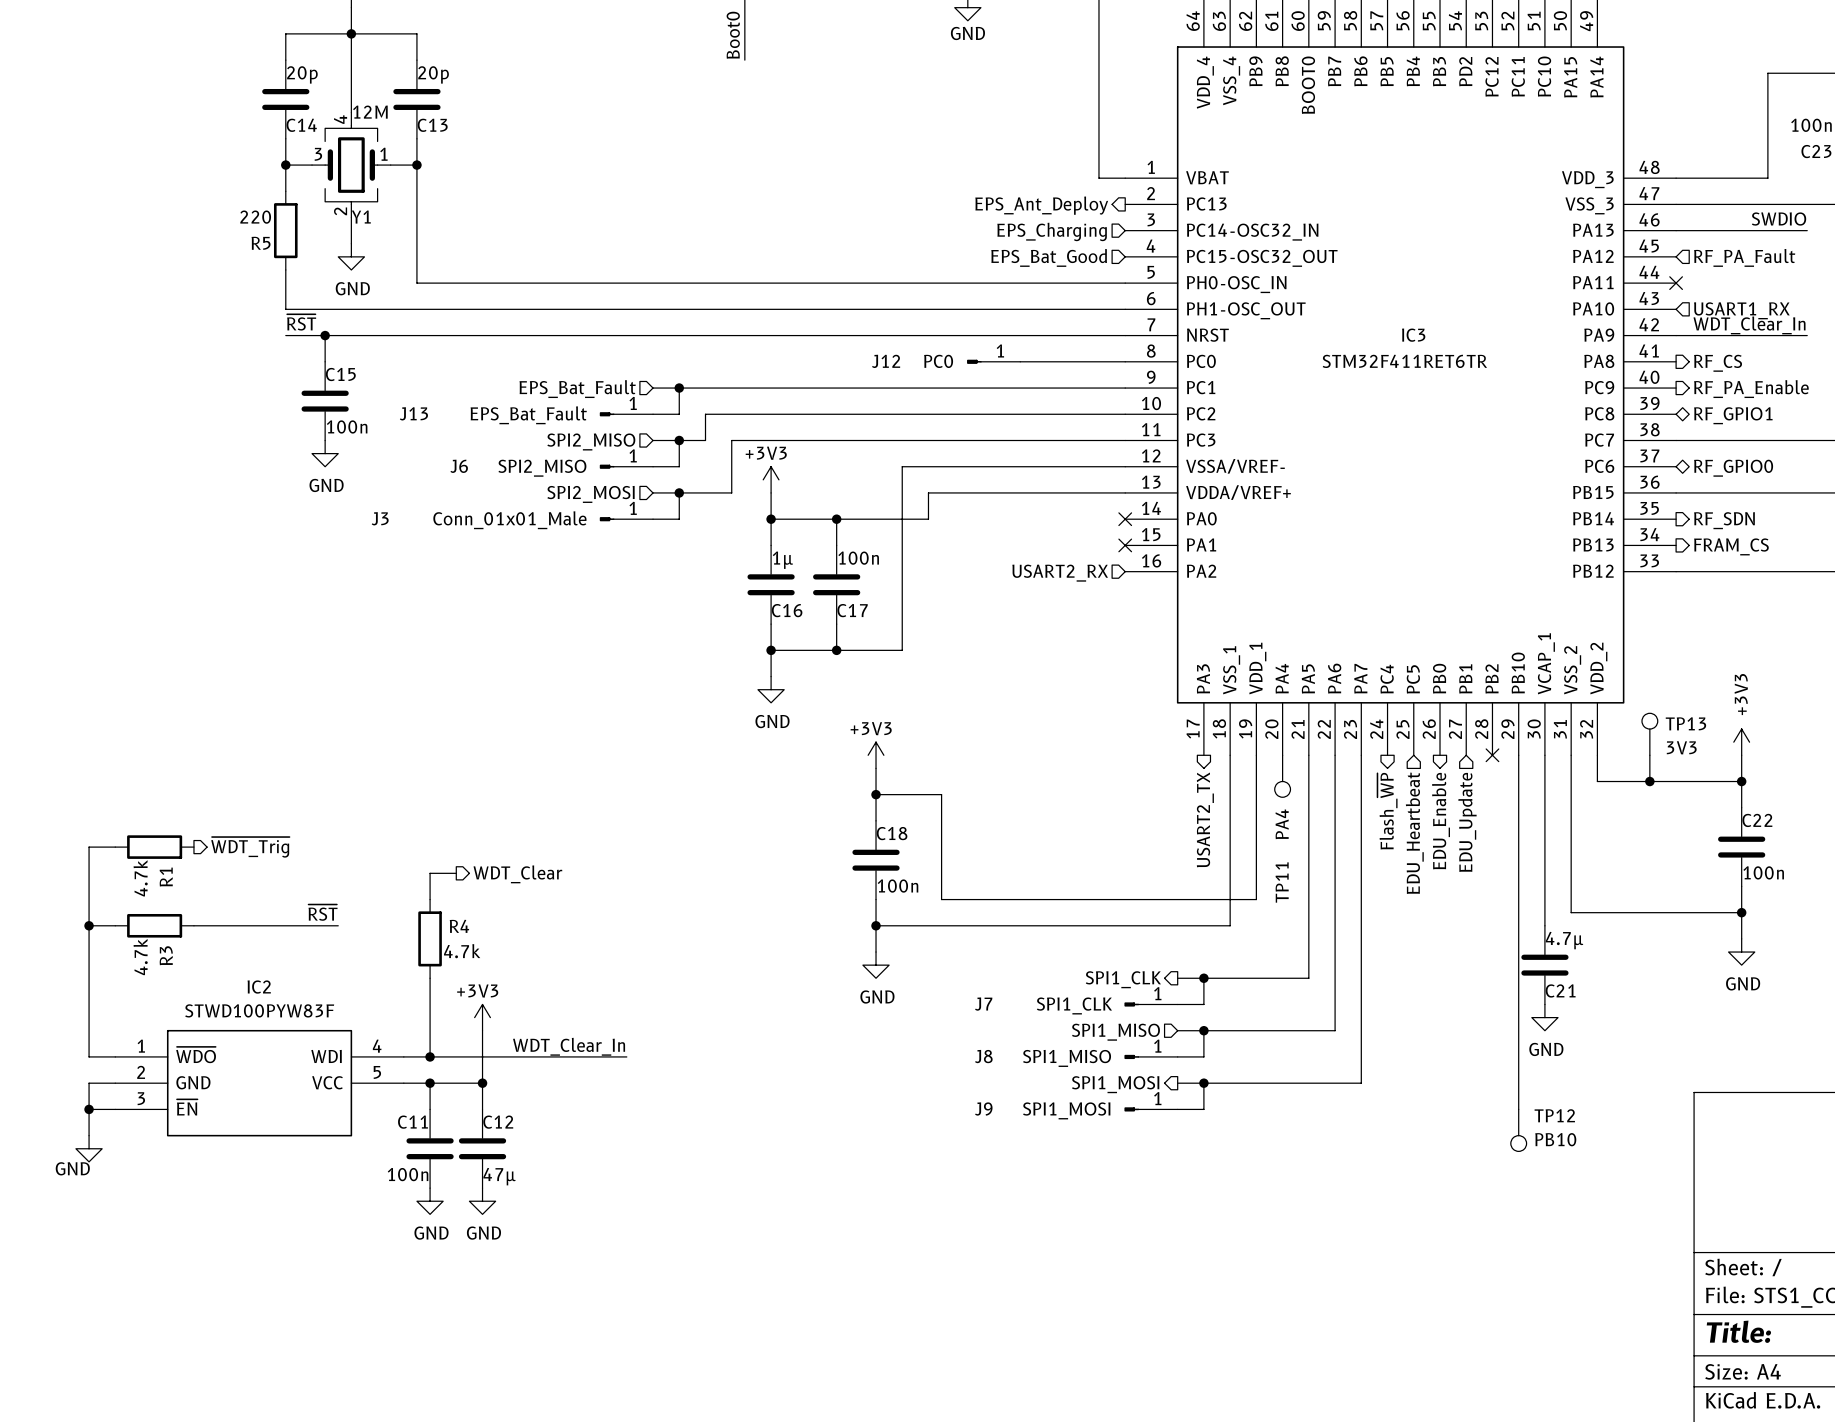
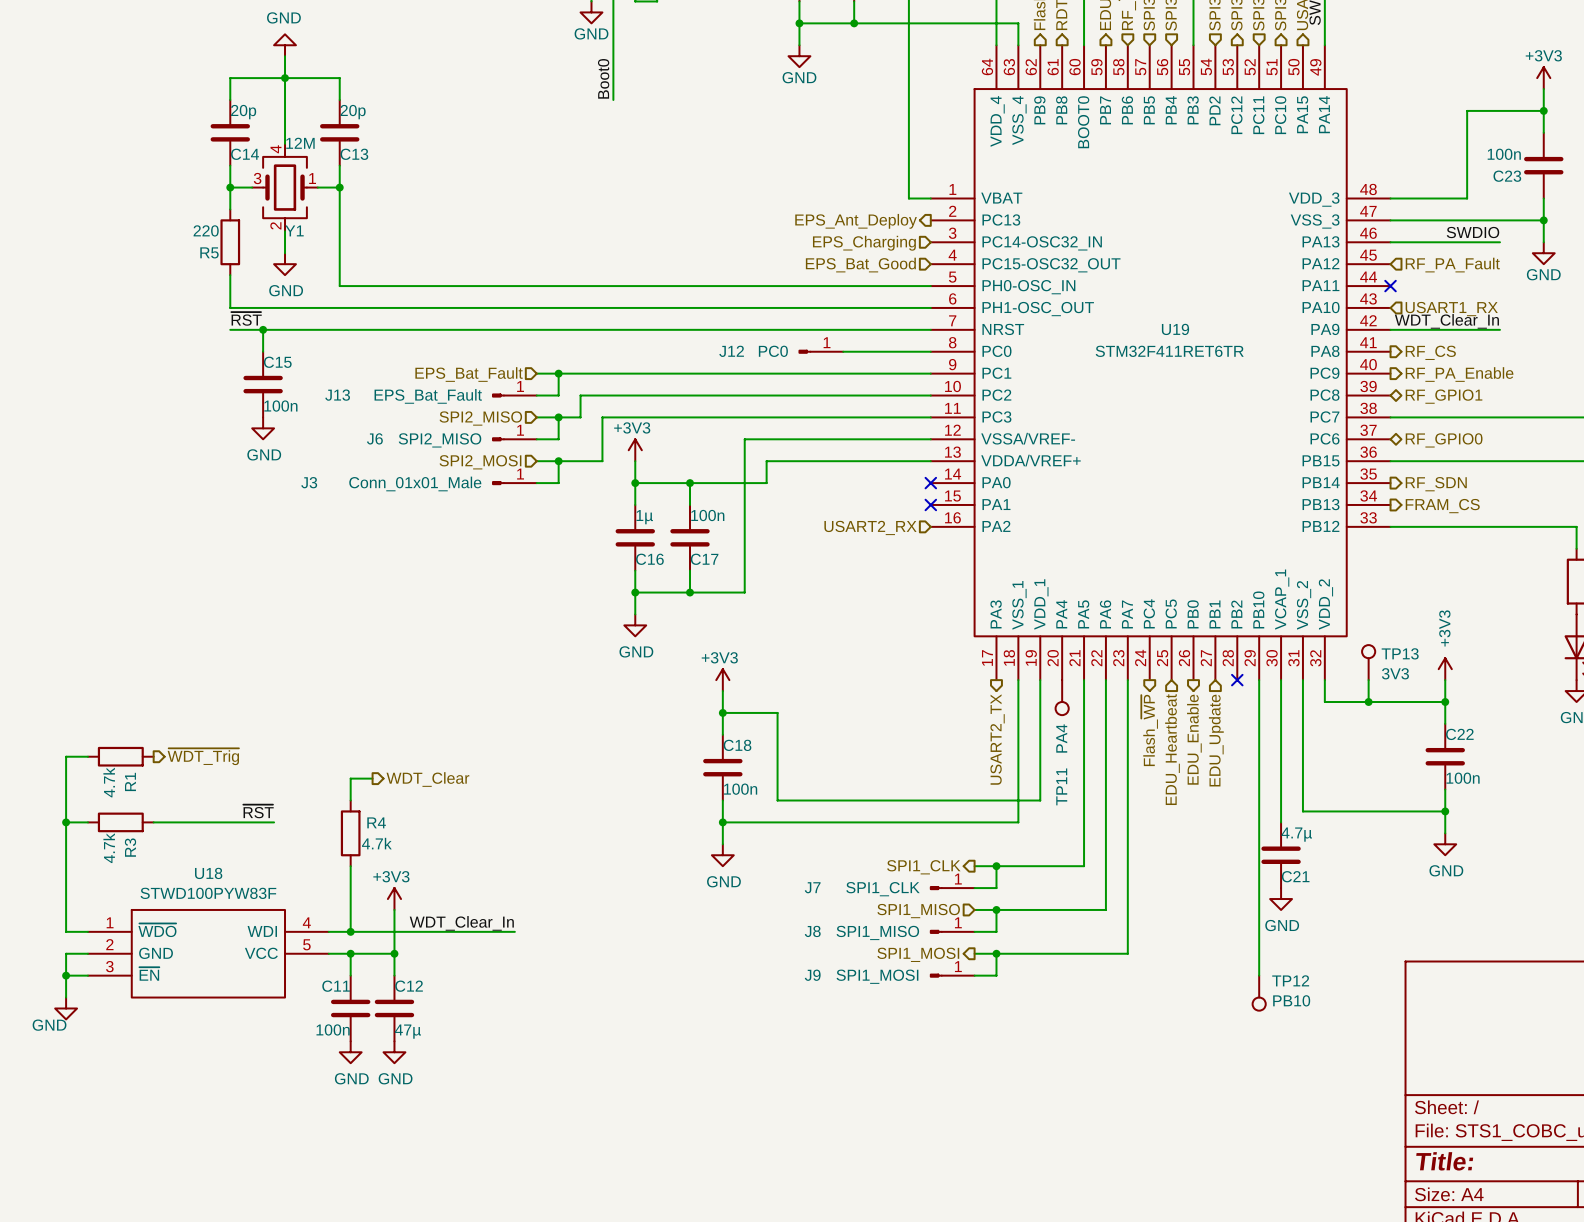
IC3 name: IC3 (1413, 335) -> U19 (1175, 329)
IC2 name: IC2 (259, 987) -> U18 (208, 873)

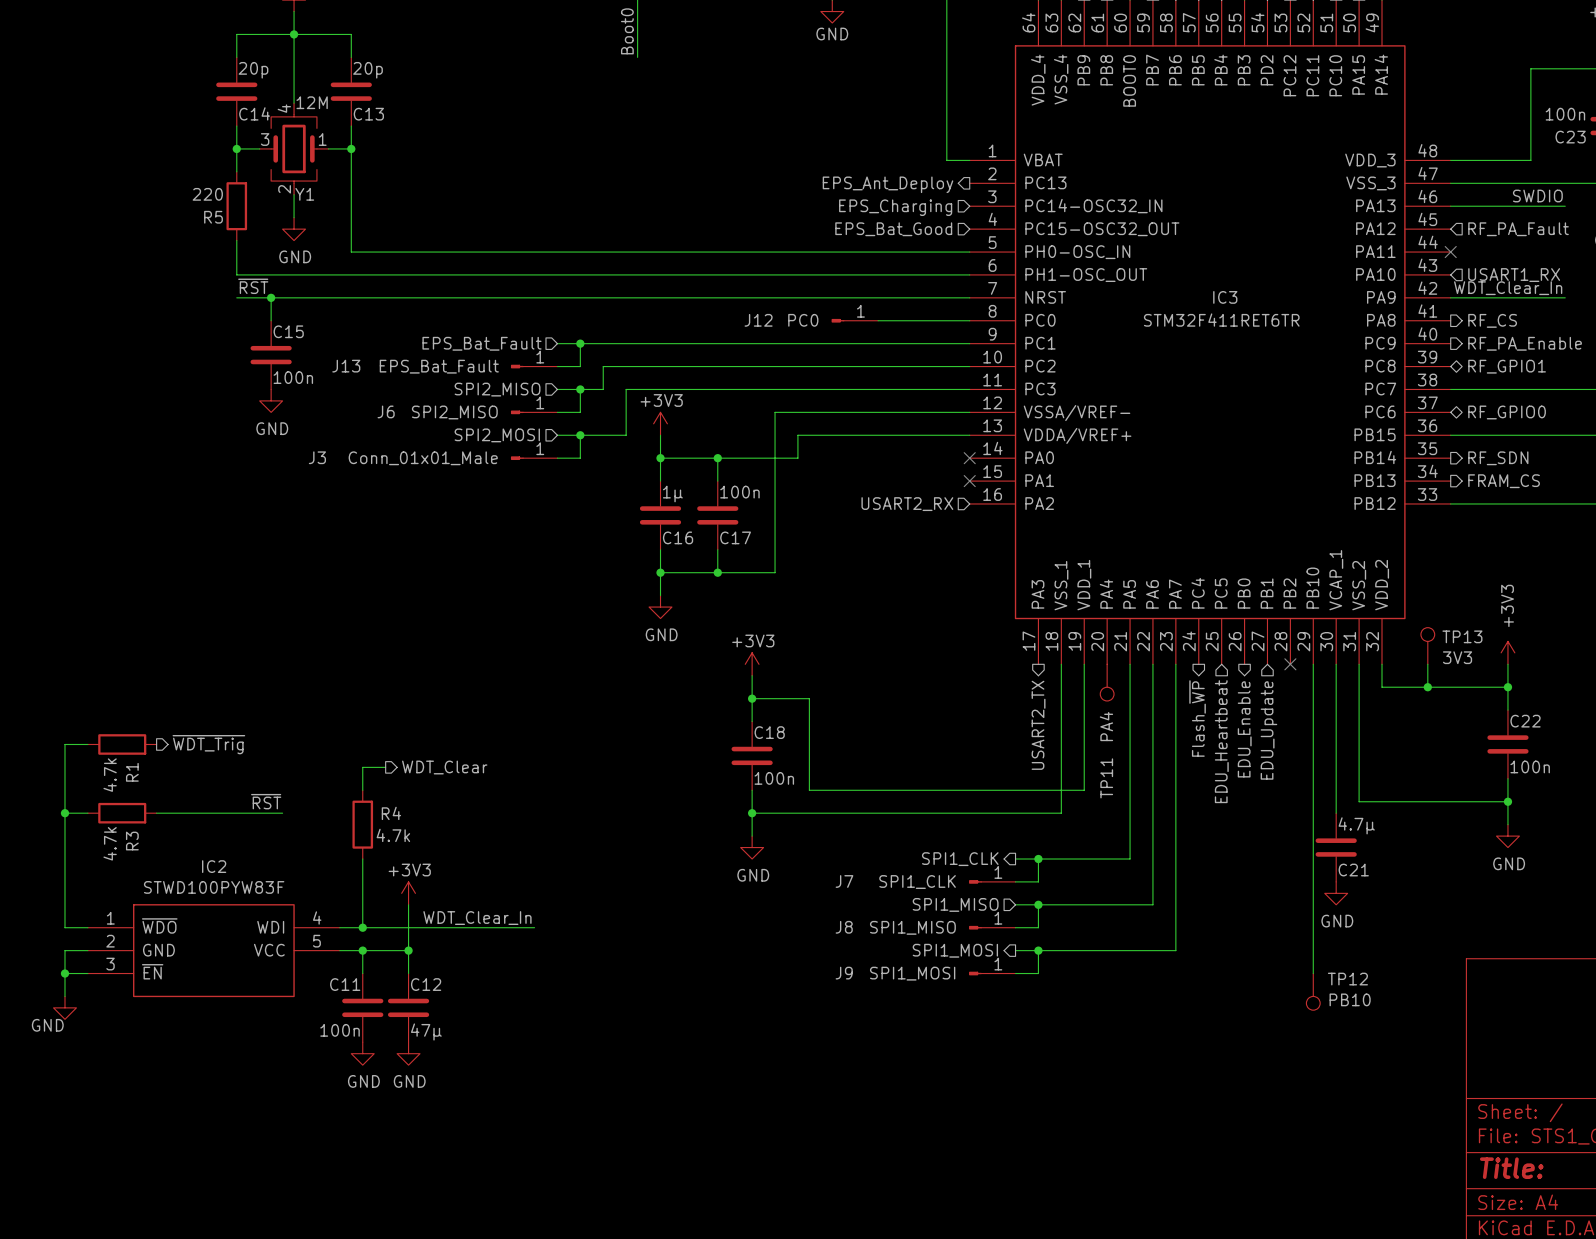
U19 name: U19 (1175, 329) -> IC3 (1225, 297)
U18 name: U18 (208, 873) -> IC2 (214, 866)

